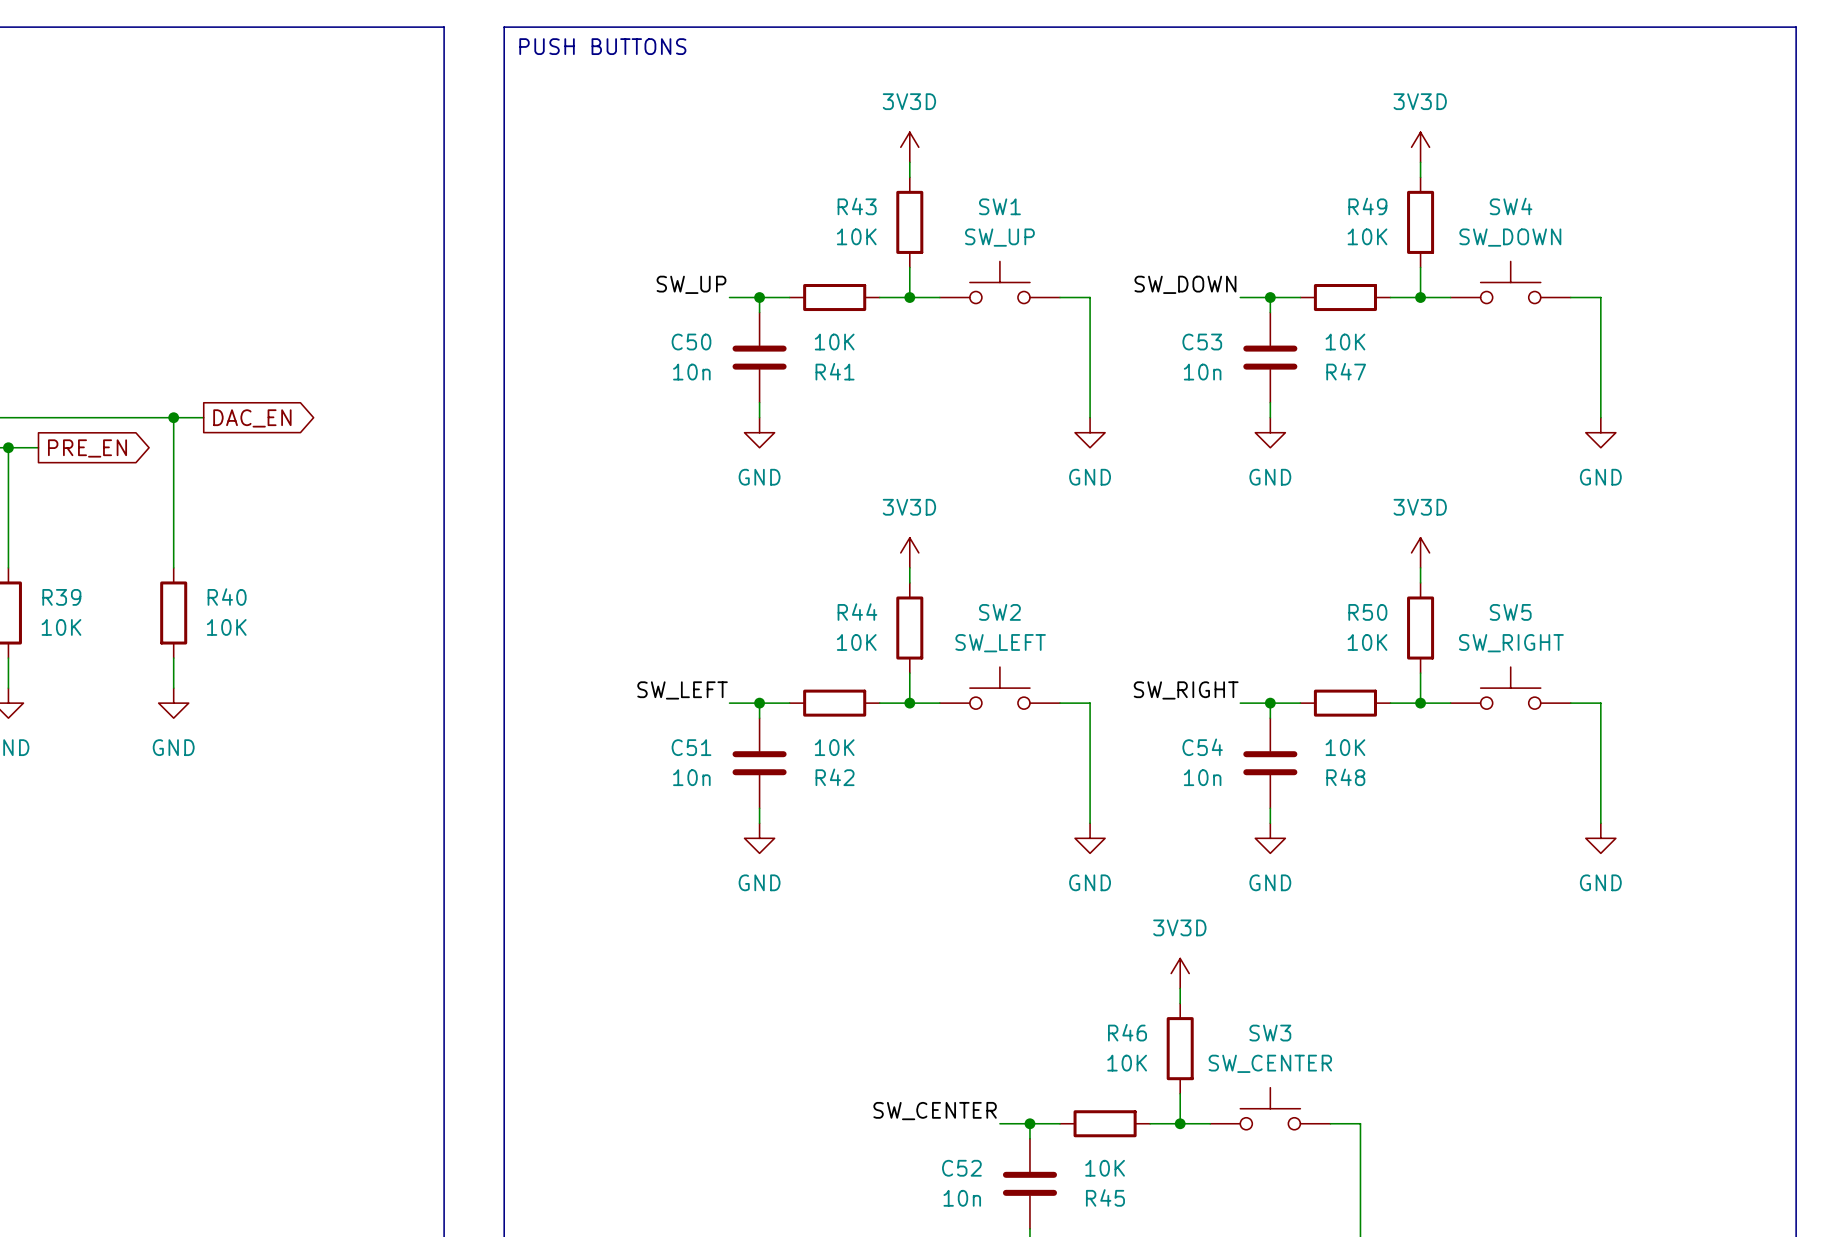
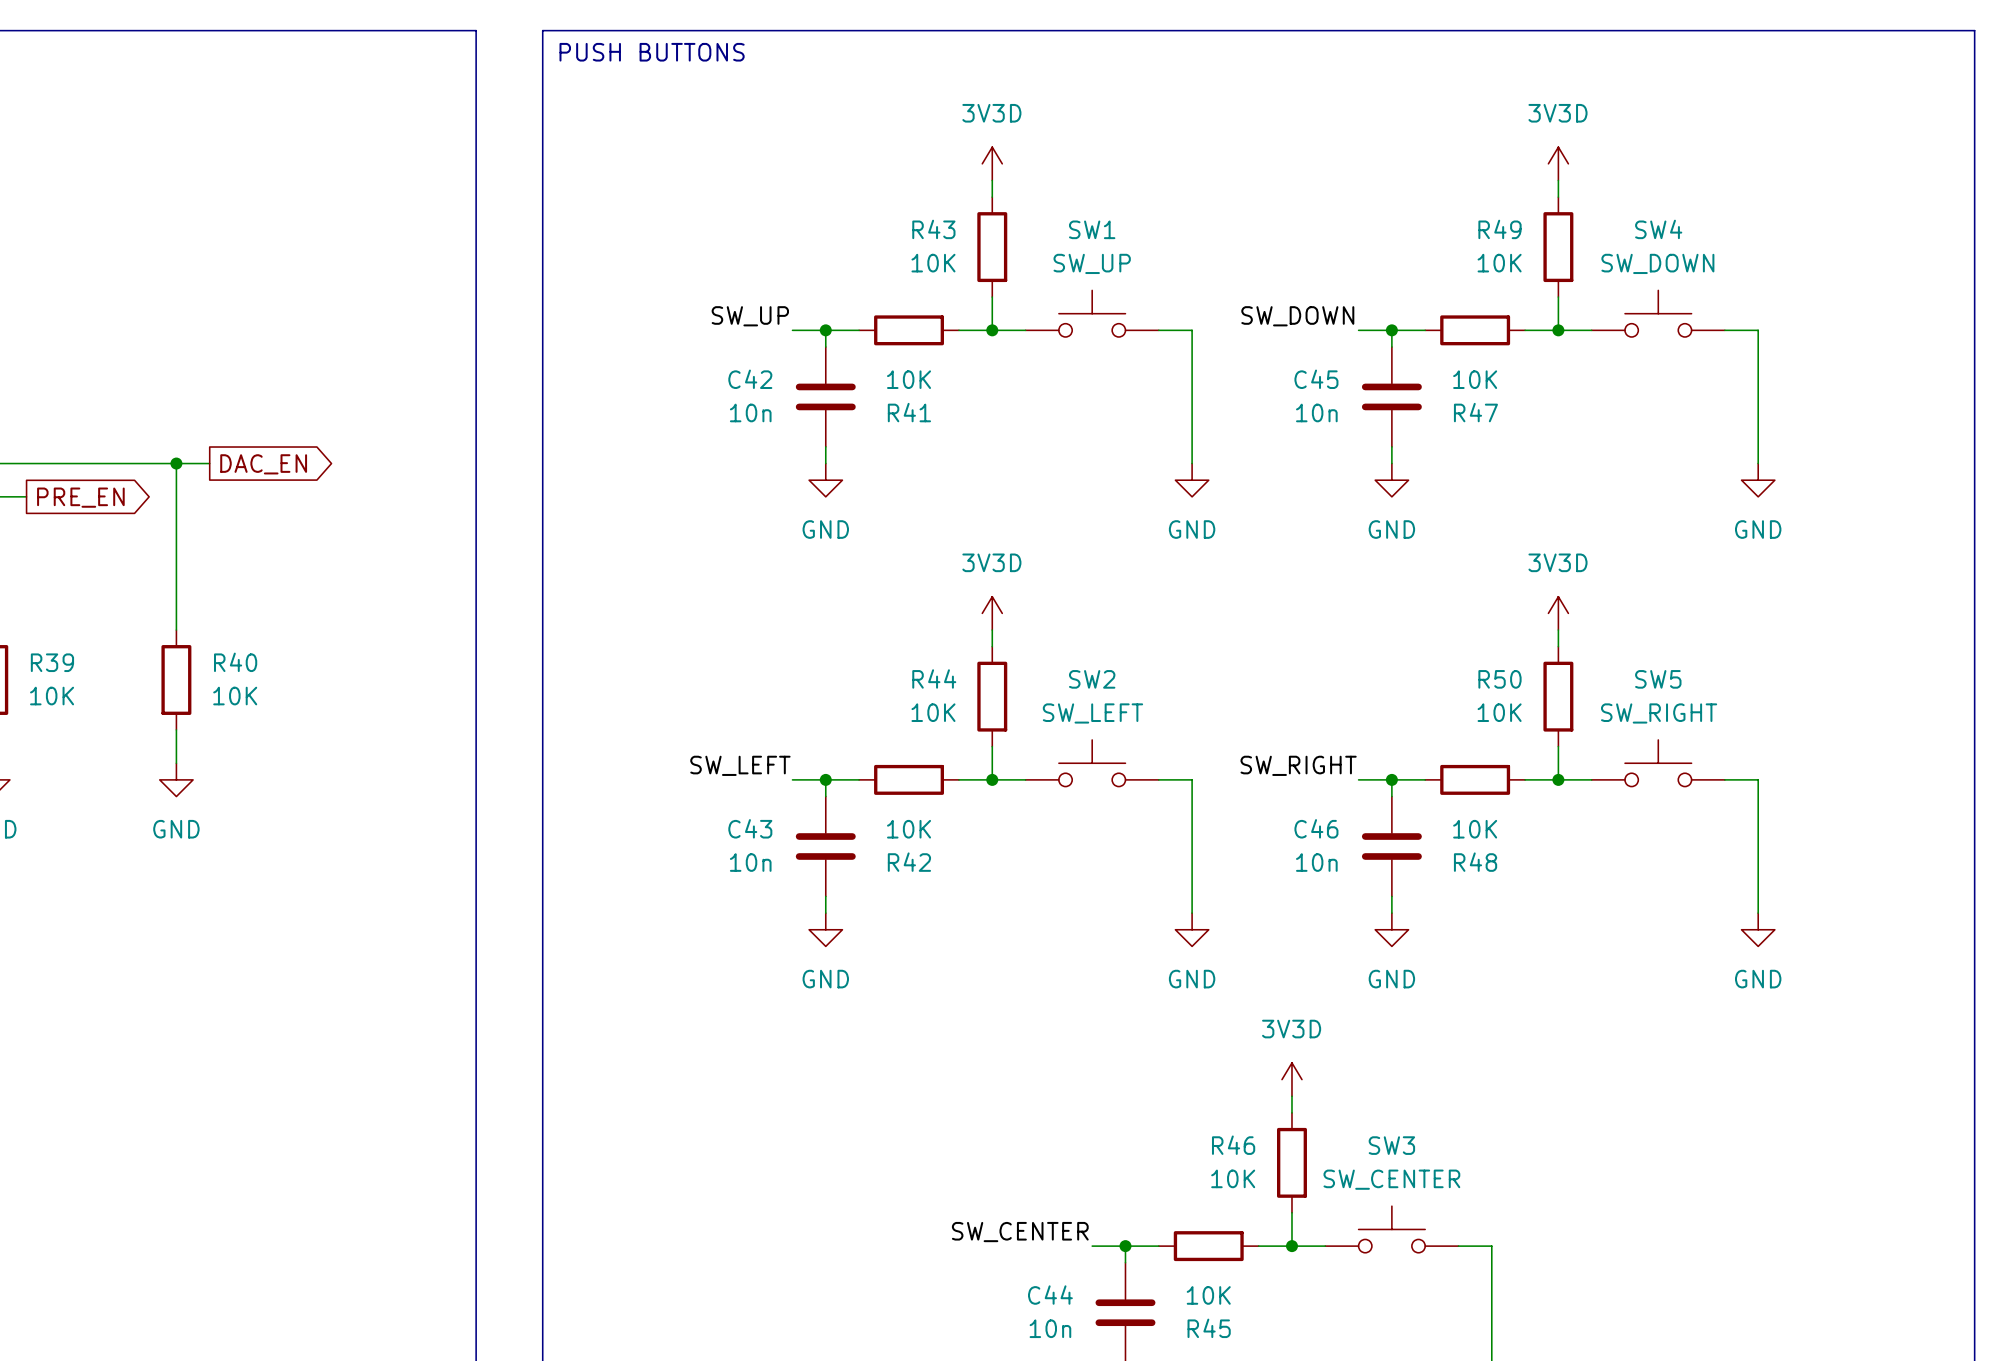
C50 name: C50 (691, 342) -> C42 (750, 379)
C53 name: C53 (1202, 342) -> C45 (1316, 379)
C51 name: C51 (691, 747) -> C43 (750, 828)
C54 name: C54 (1202, 747) -> C46 (1316, 828)
C52 name: C52 (961, 1168) -> C44 (1050, 1295)

